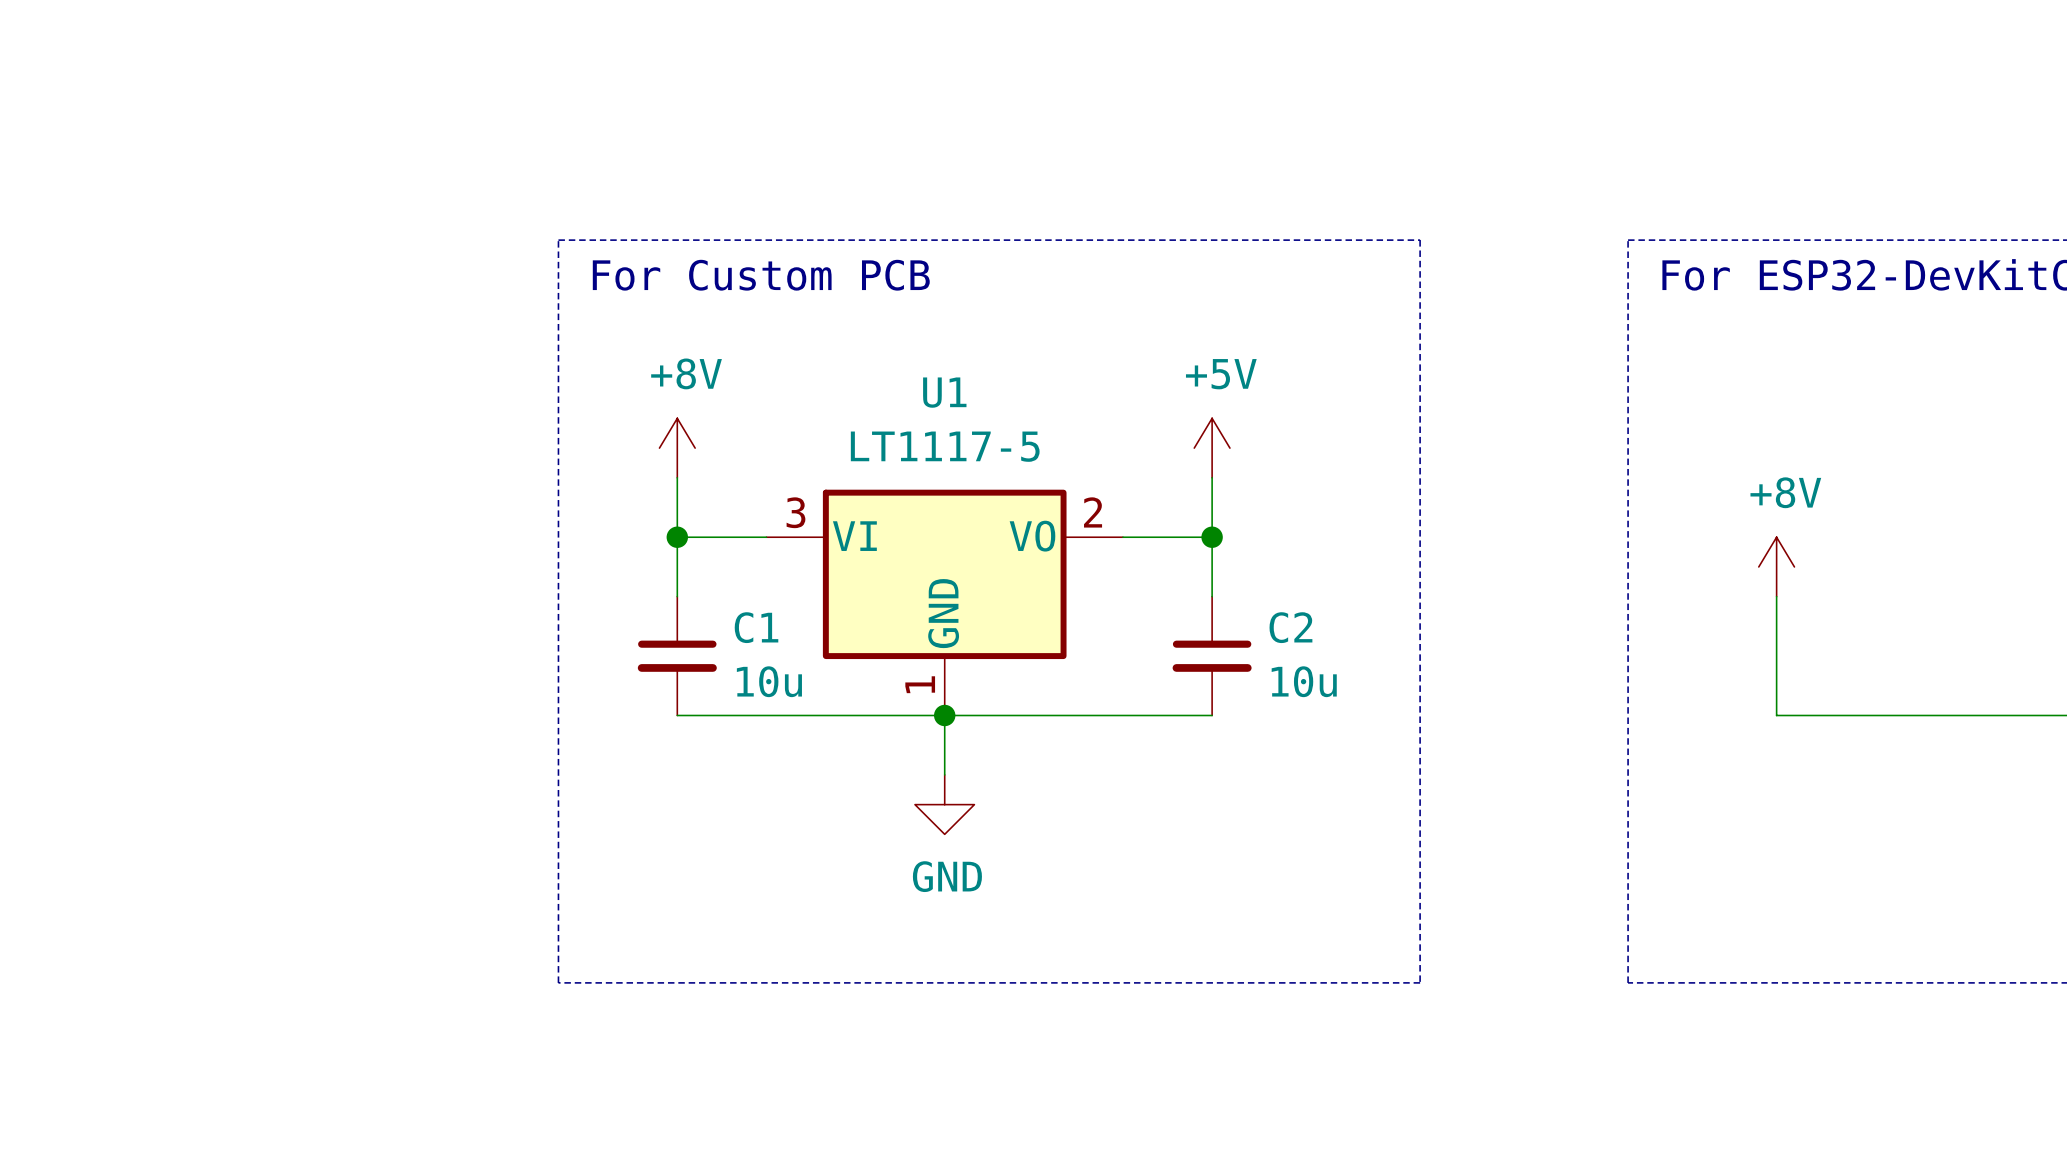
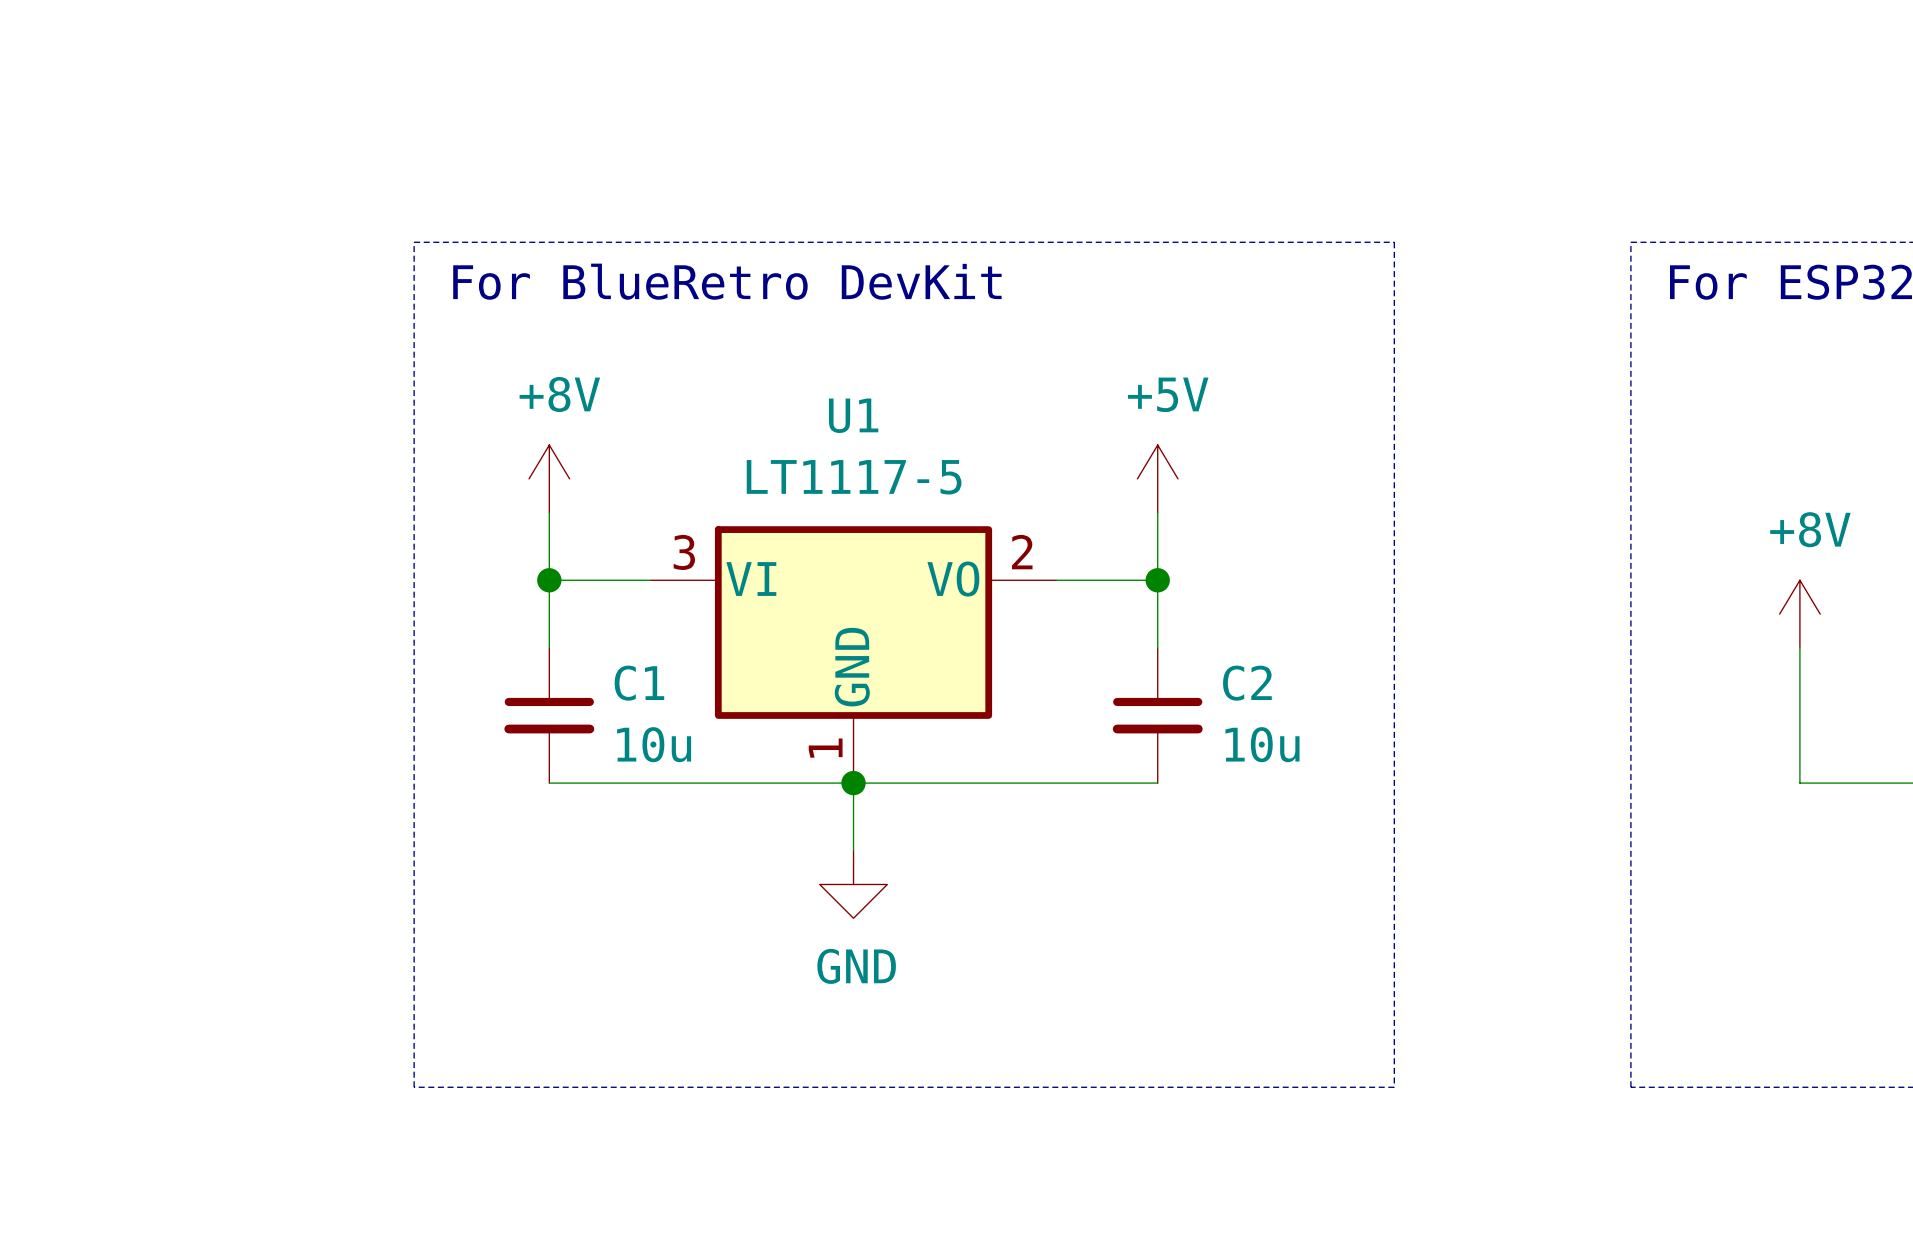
text: For Custom PCB (761, 275) -> For BlueRetro DevKit (727, 281)

